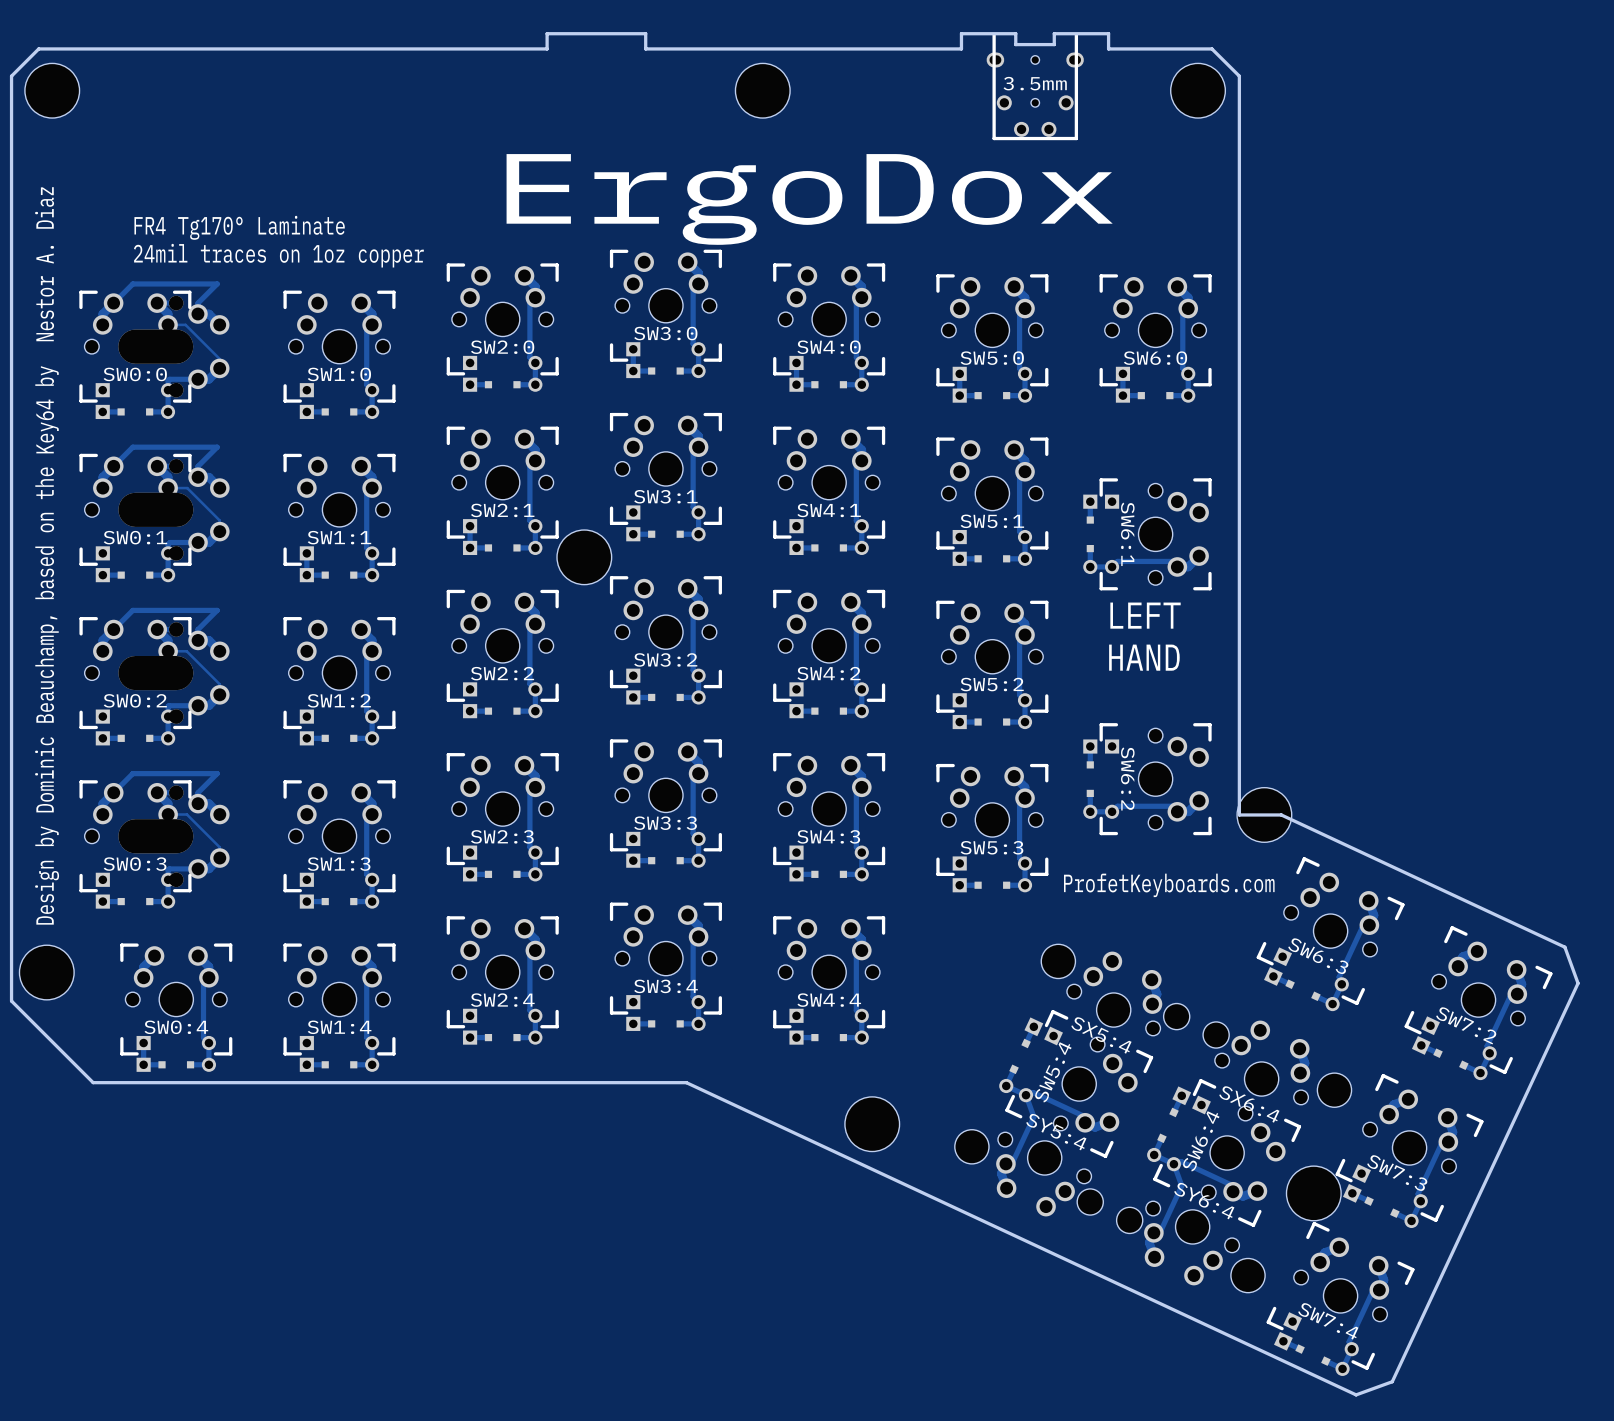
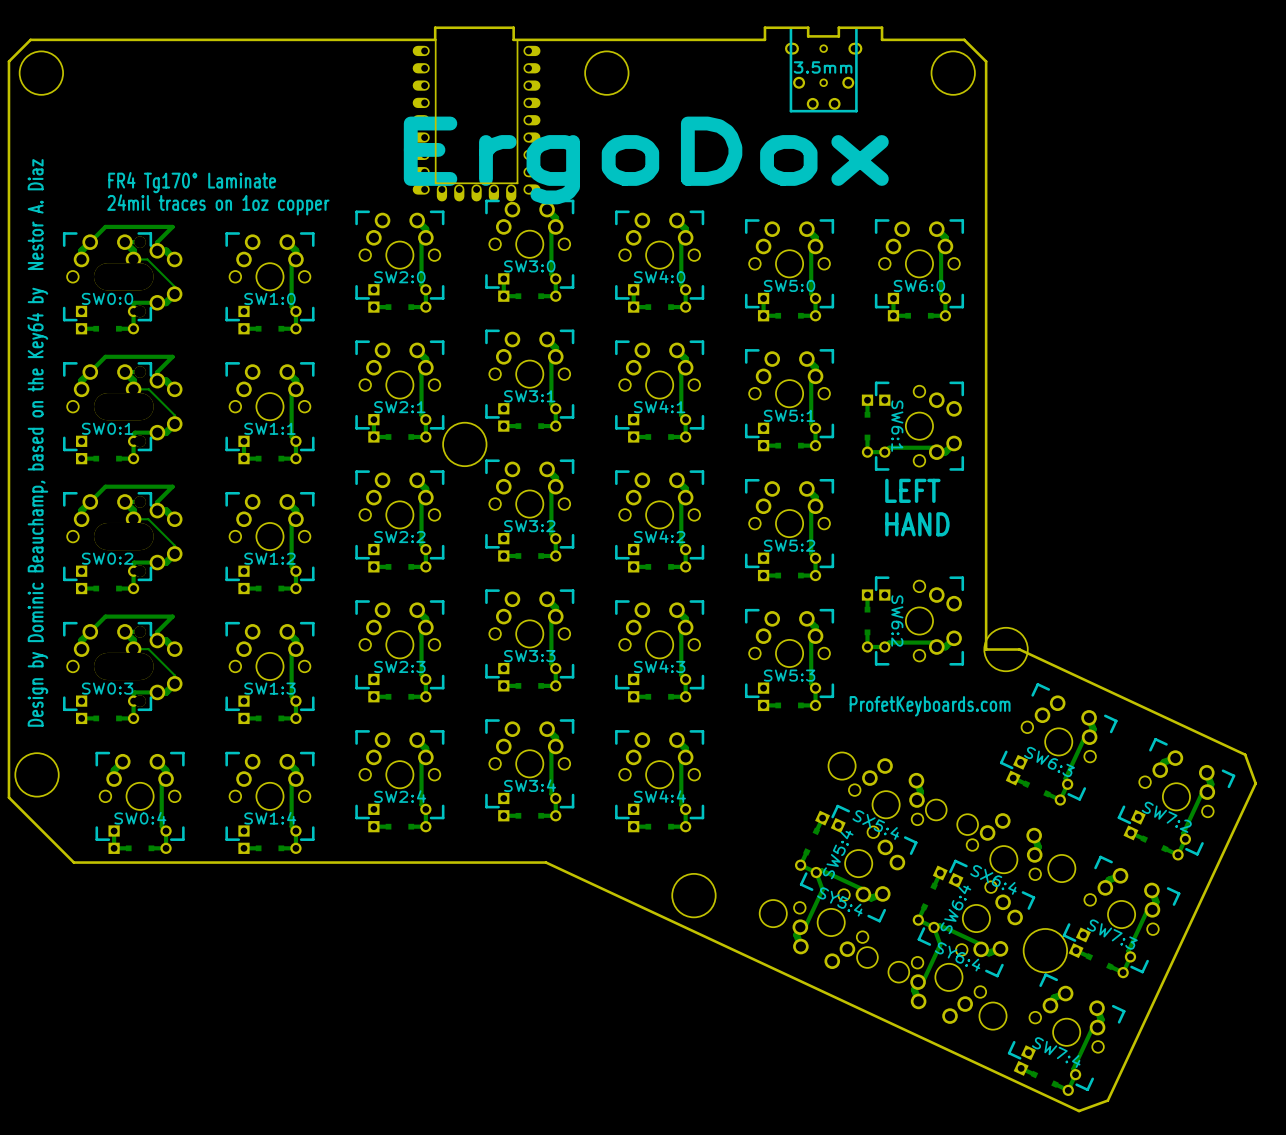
part: none -> (476, 120)

